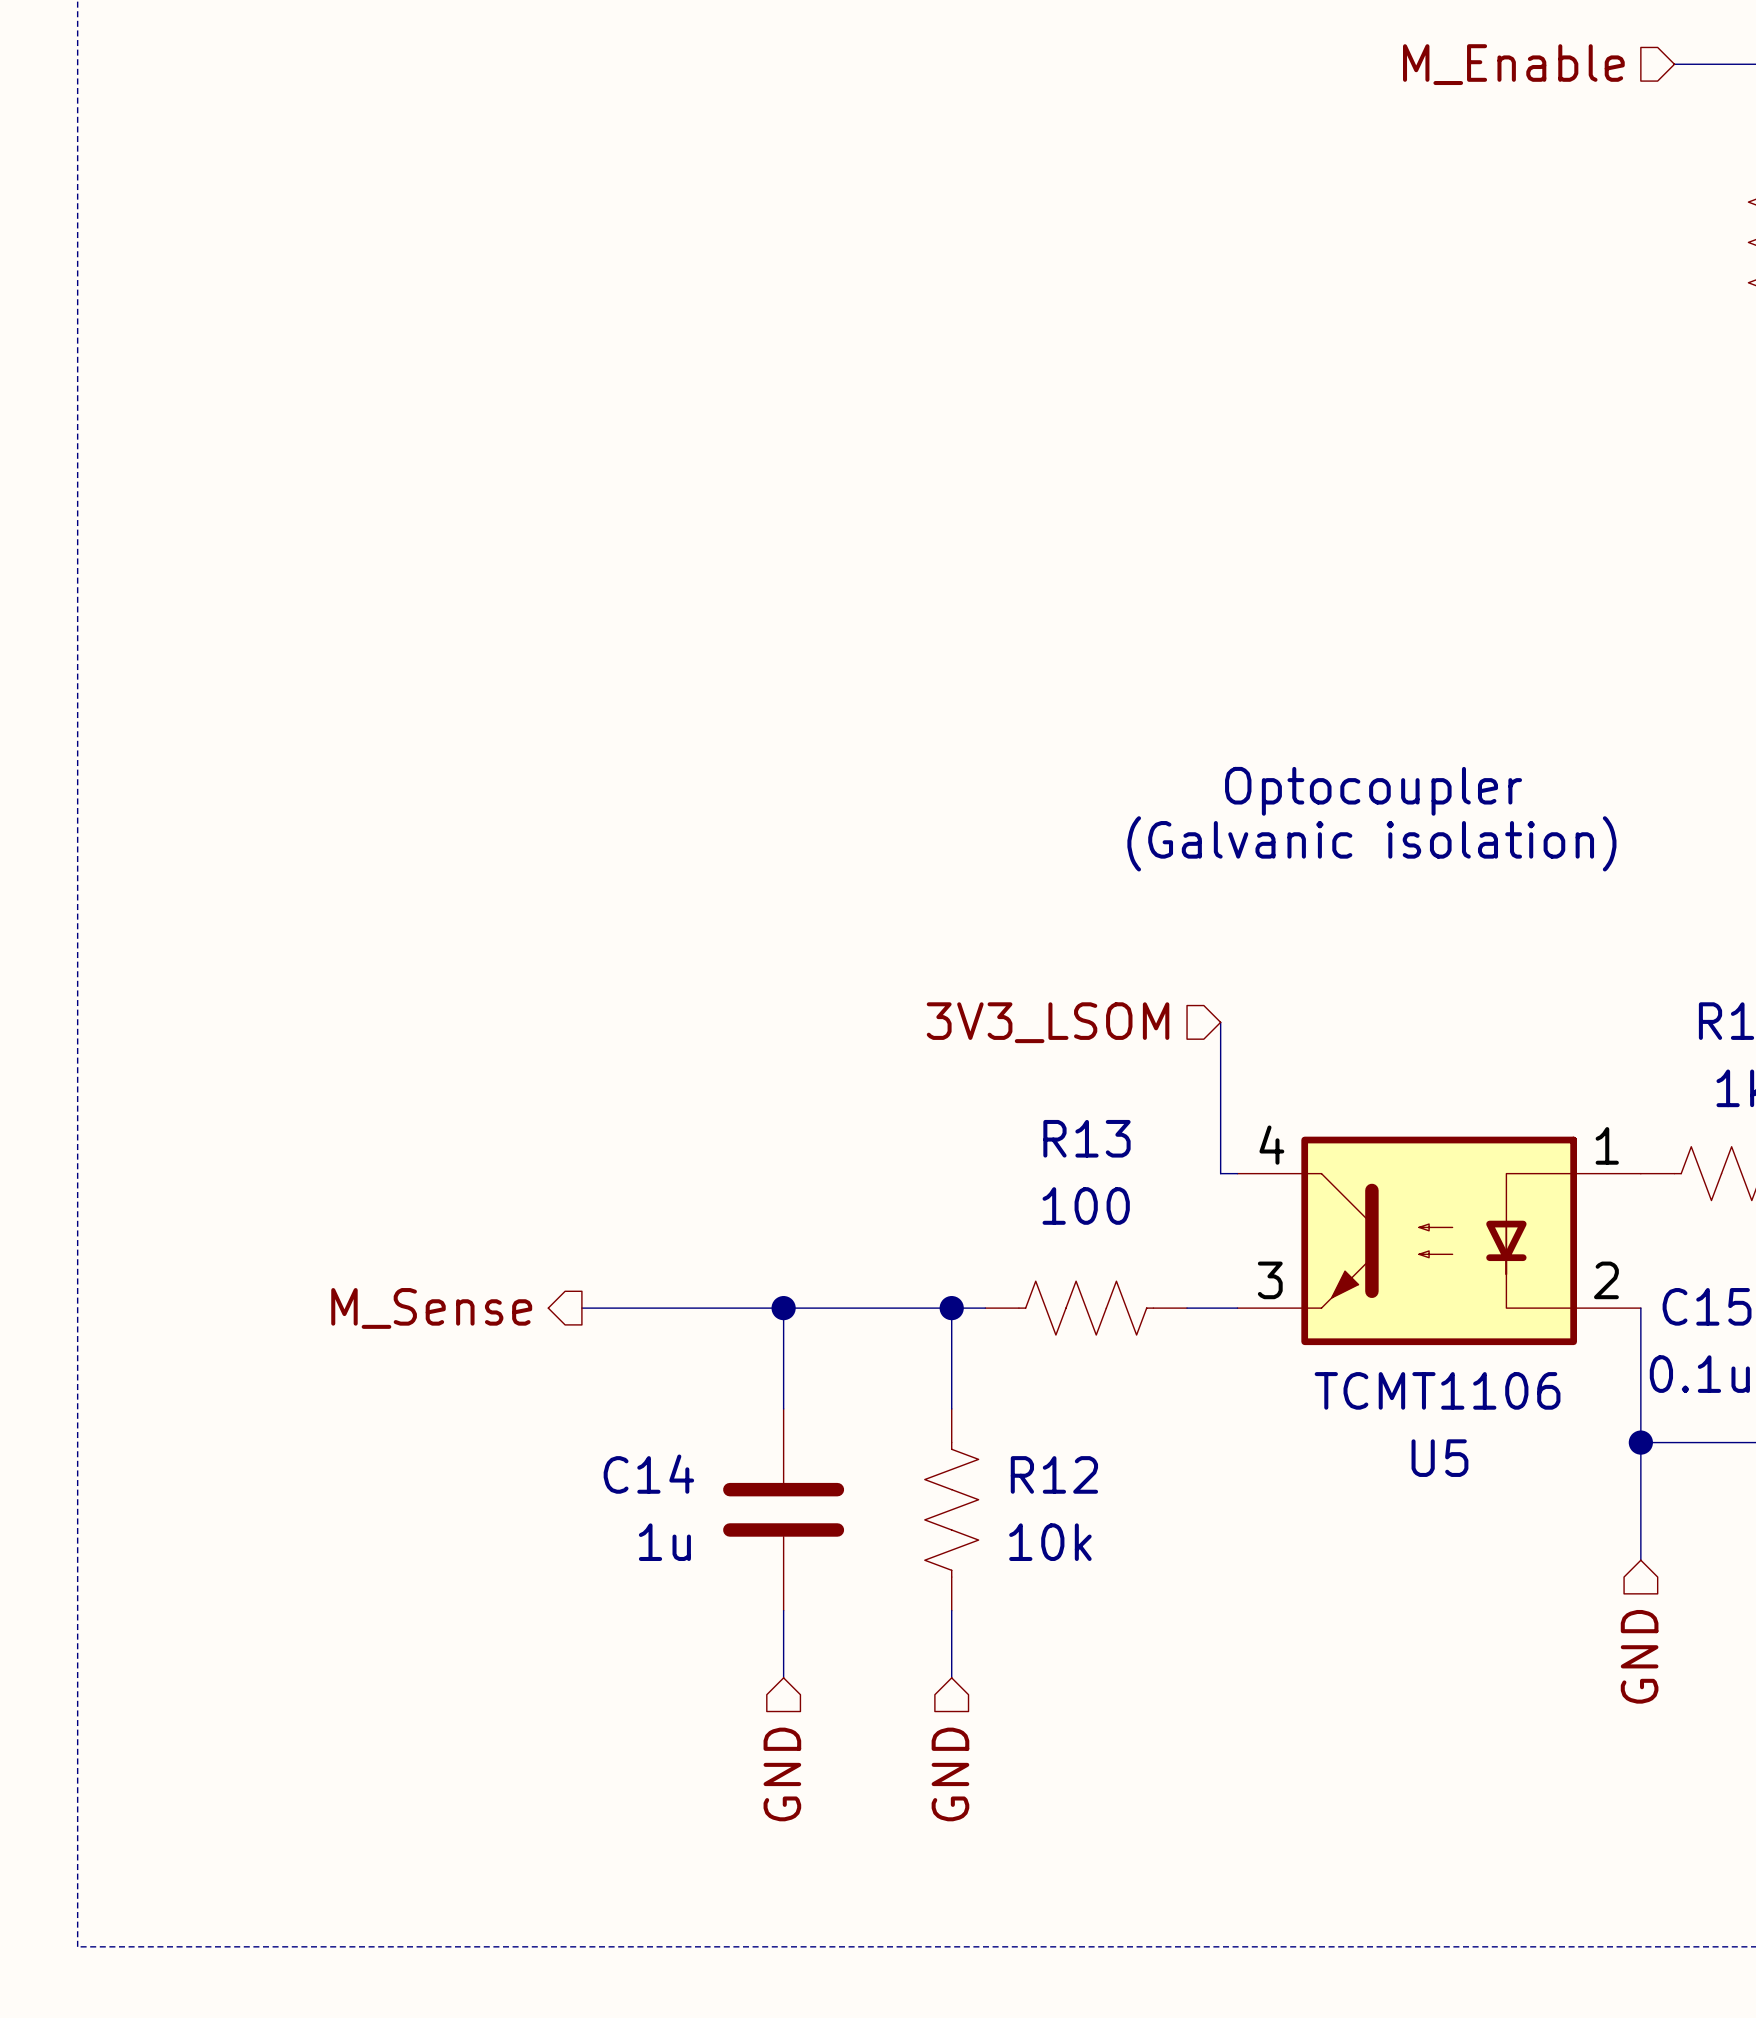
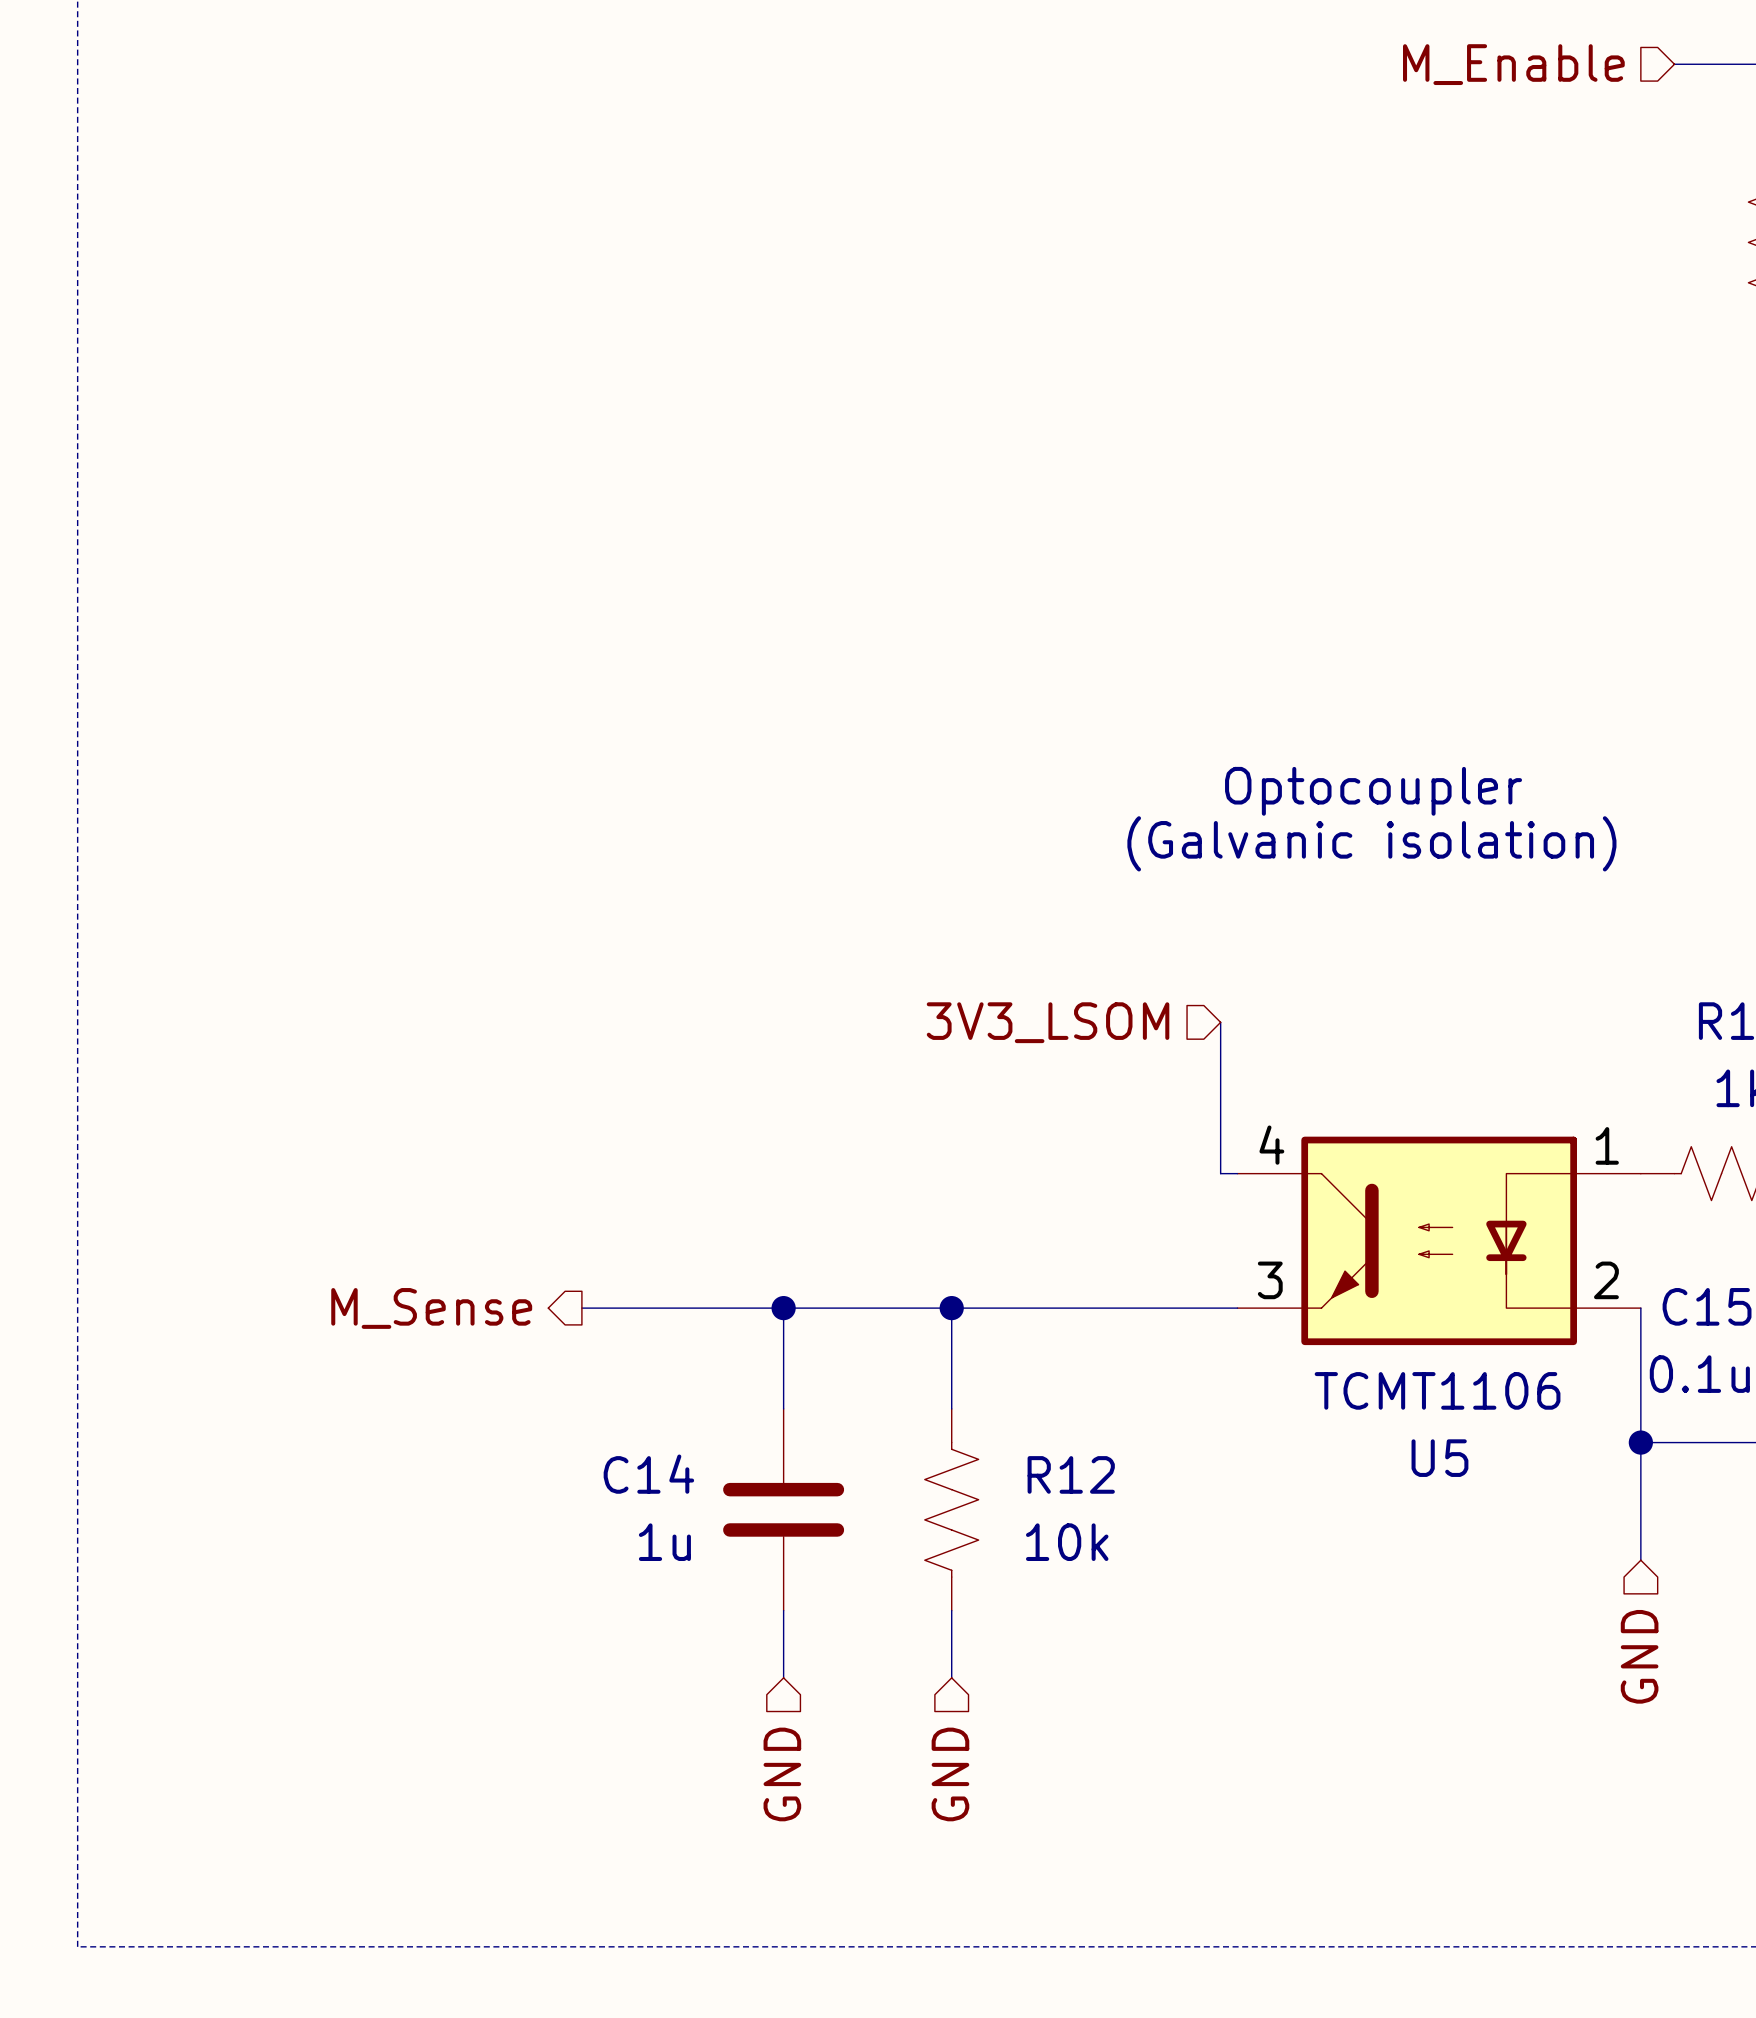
wire: none -> (985, 1308) (1187, 1308)
R13: 100 (1086, 1308) -> none
R12 name position: R12 (1054, 1474) -> R12 (1071, 1474)
R12 value position: 10k (1050, 1542) -> 10k (1067, 1542)

